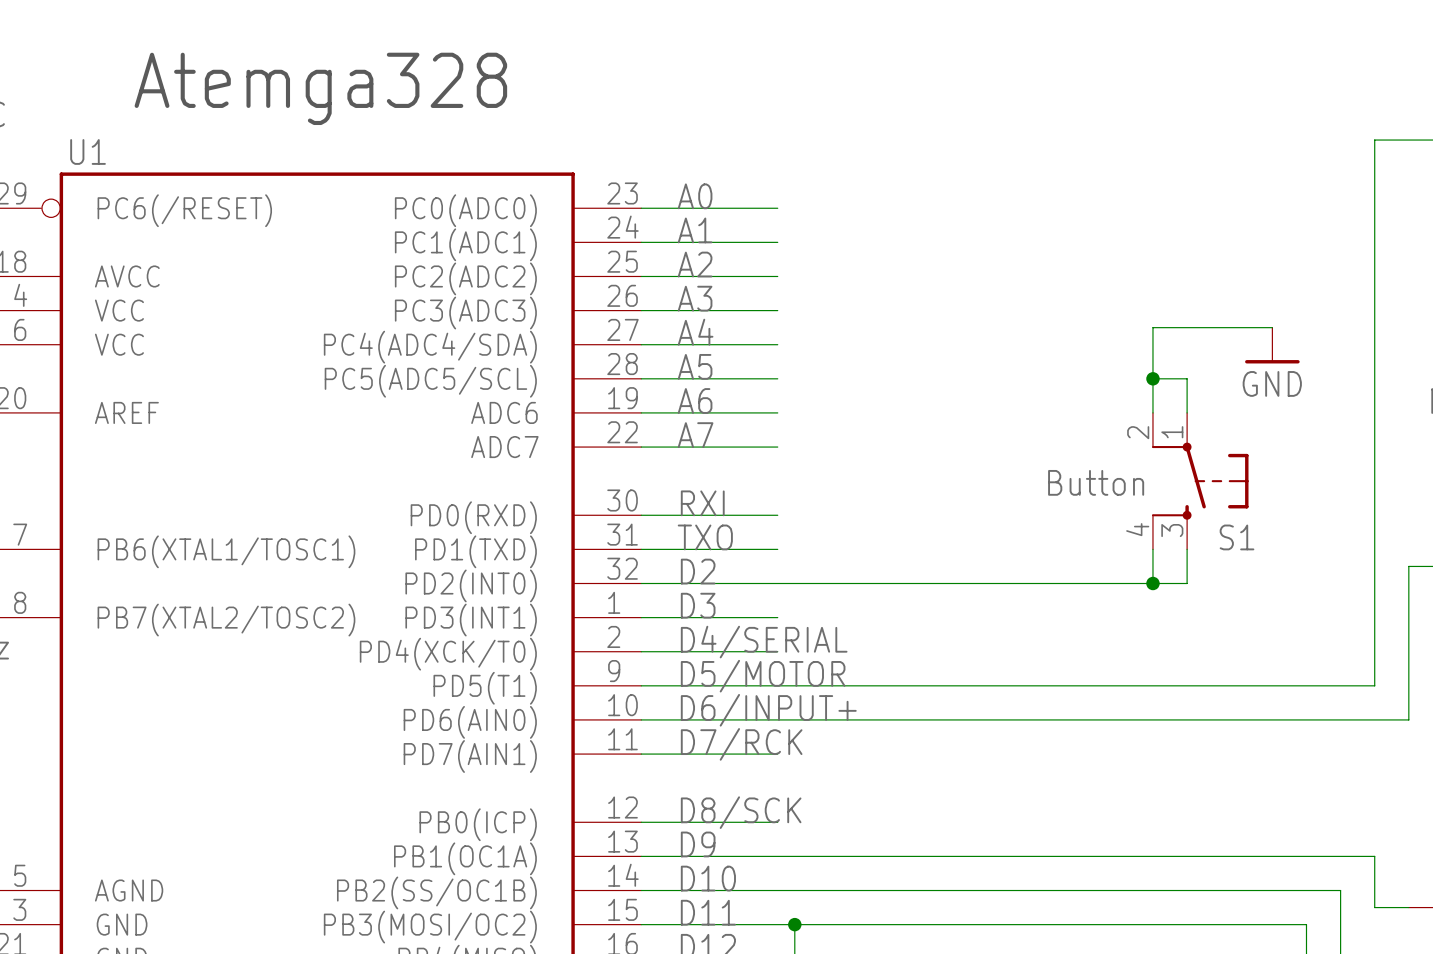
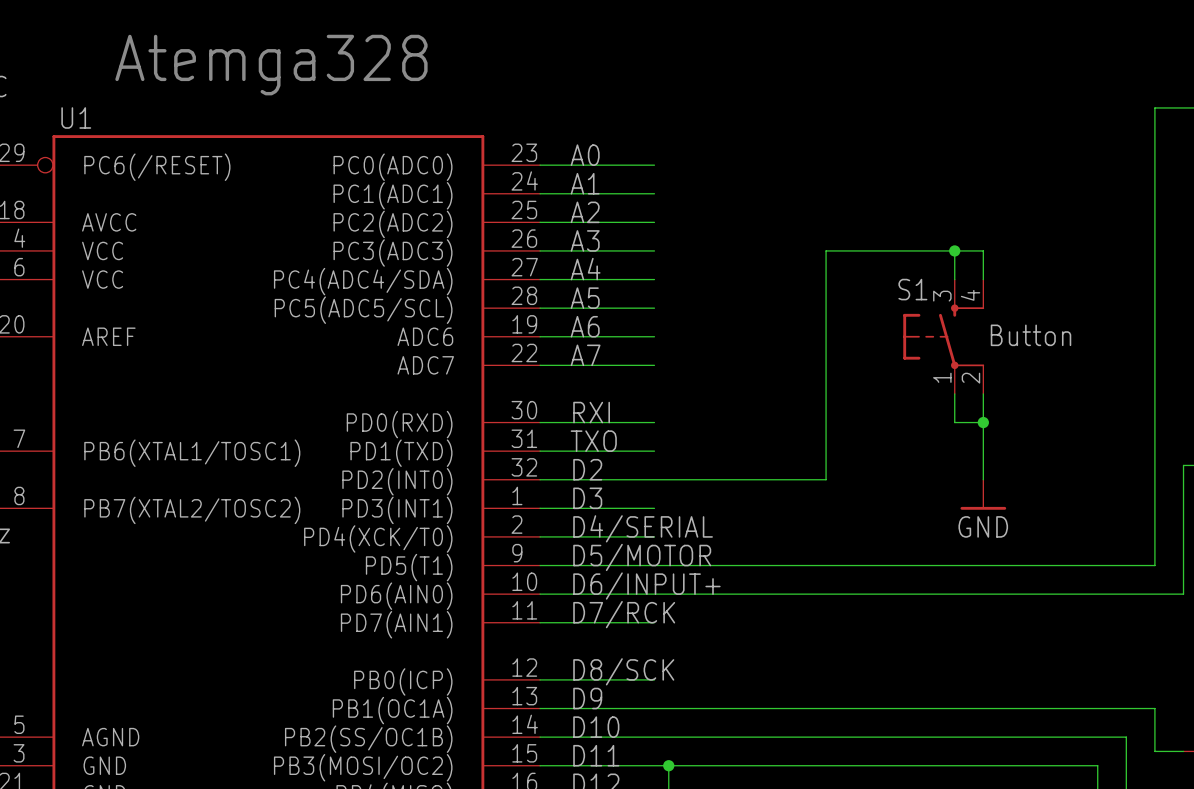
junction: none -> (954, 250)
wire: (1272, 327) (1152, 327) (1152, 412) -> none
power symbol position: GND (1272, 345) -> GND (983, 494)
wire: (1152, 378) (1187, 378) (1187, 412) -> none
junction: (1152, 378) -> none
wire: none -> (954, 393) (954, 422) (983, 422)
wire: none -> (983, 393) (983, 479)
S1 rotation: 0° (1200, 481) -> 180° (943, 336)
S1 position: (1200, 481) -> (943, 336)
junction: none -> (983, 422)
wire: (1152, 549) (1152, 583) -> (954, 250) (954, 279)
wire: (1187, 549) (1187, 583) (982, 583) -> (983, 279) (983, 250) (826, 250) (826, 479)
junction: (1152, 583) -> none

